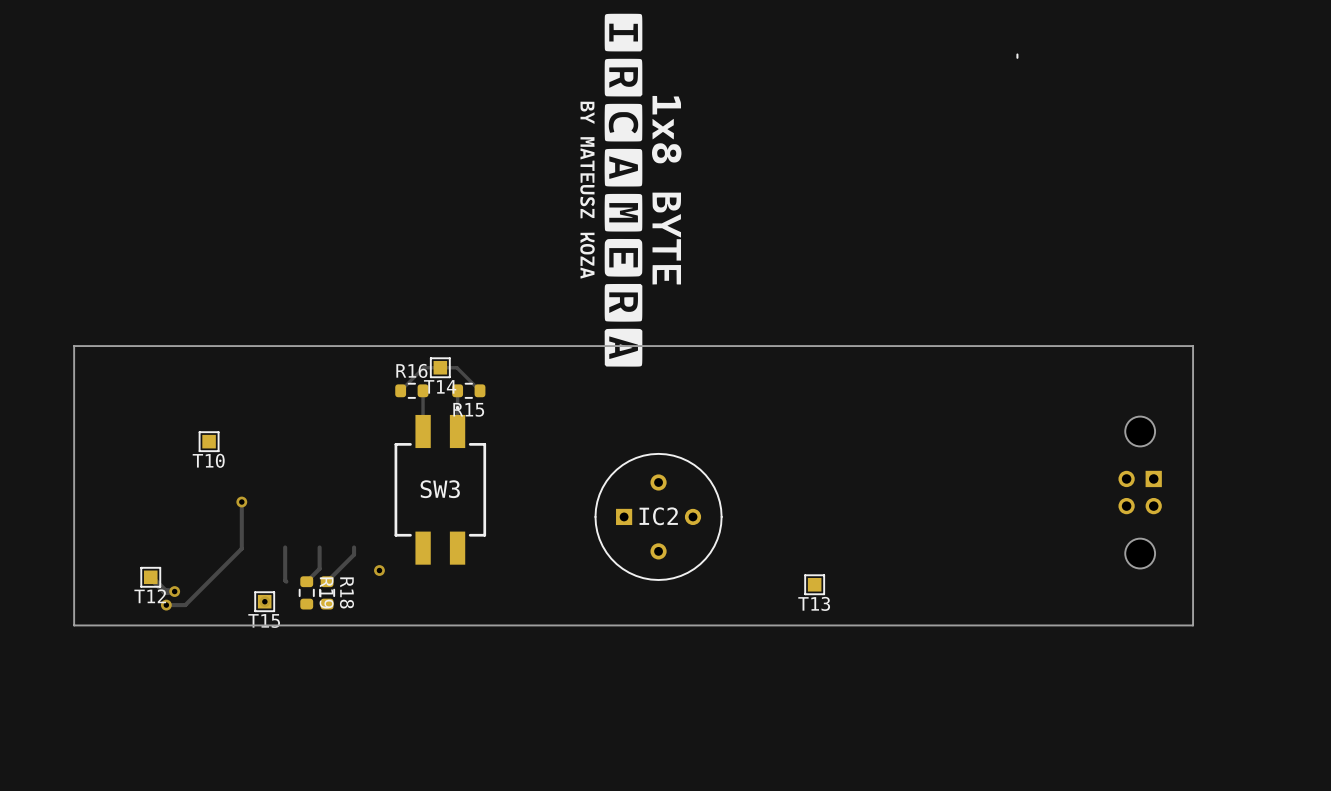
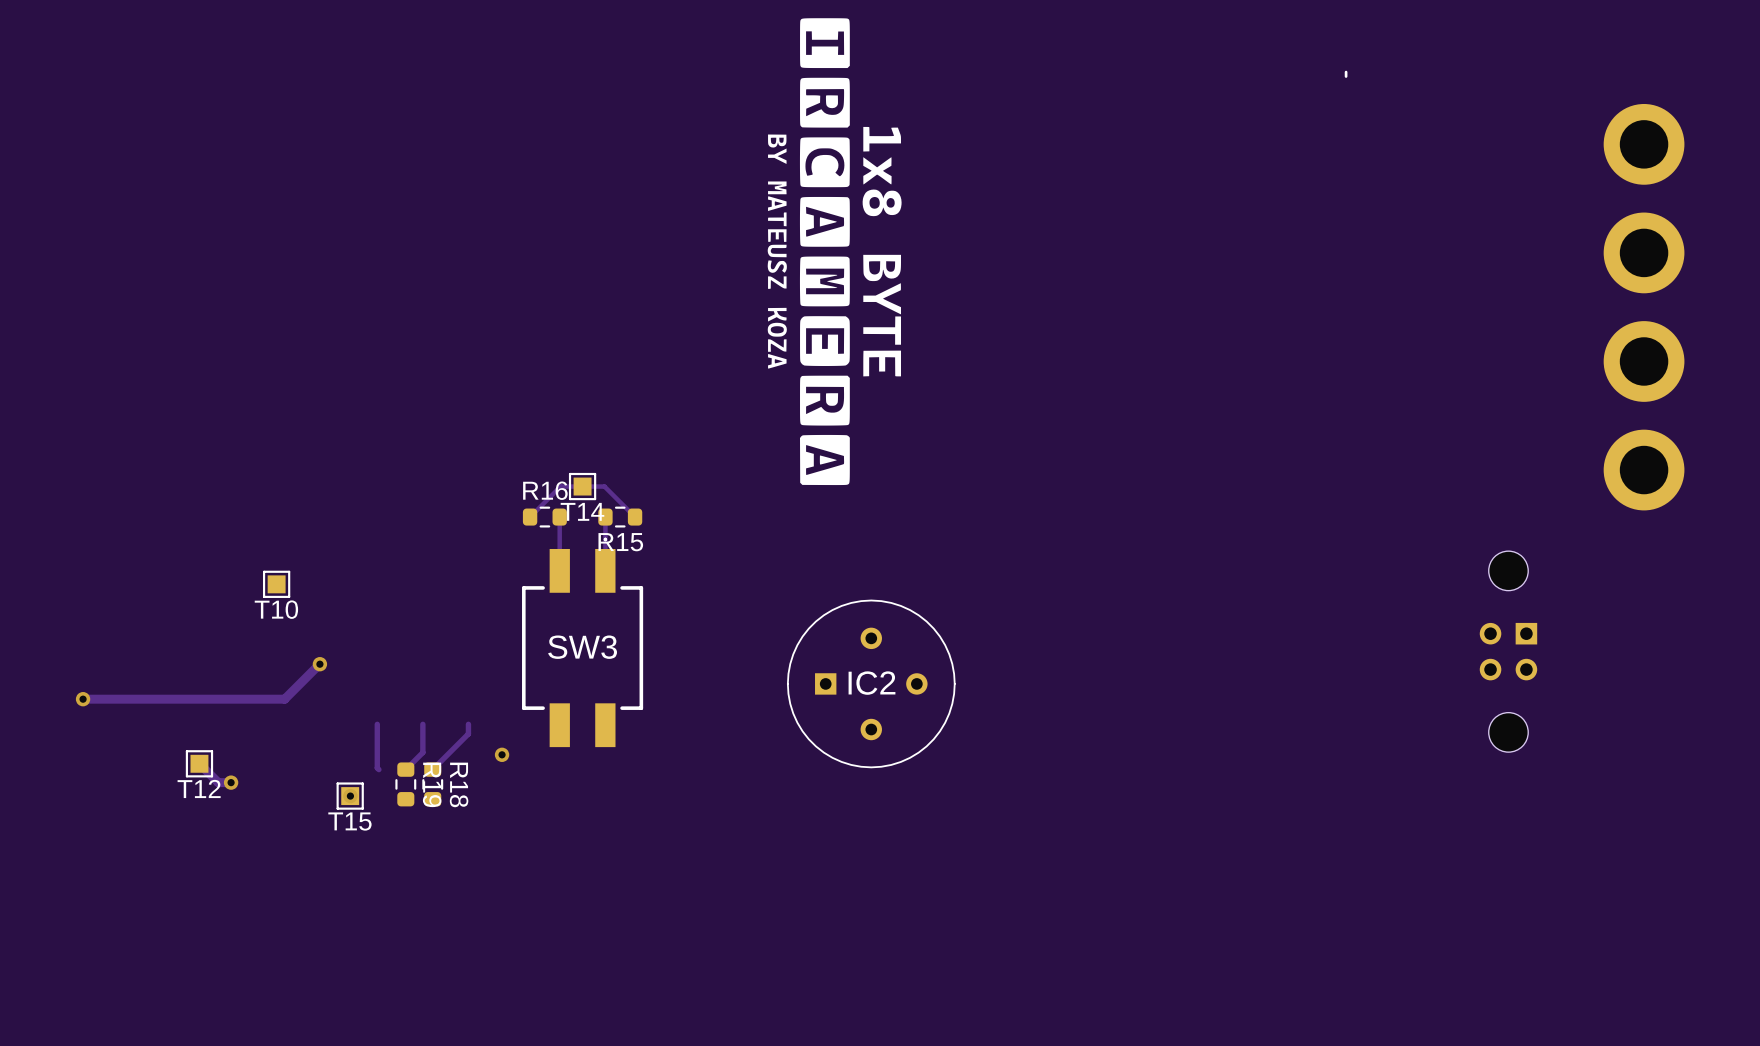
part: none -> (1644, 144)
part: none -> (1644, 252)
part: none -> (1644, 361)
board edge: (1193, 346) (74, 346) (74, 625) (1193, 625) (1193, 346) -> none
part: none -> (1644, 470)
track: (241, 502) (241, 548) (185, 605) (166, 605) -> (319, 664) (284, 699) (82, 699)
via: none -> (83, 699)
T13: (814, 584) -> none
via: (166, 605) -> none

